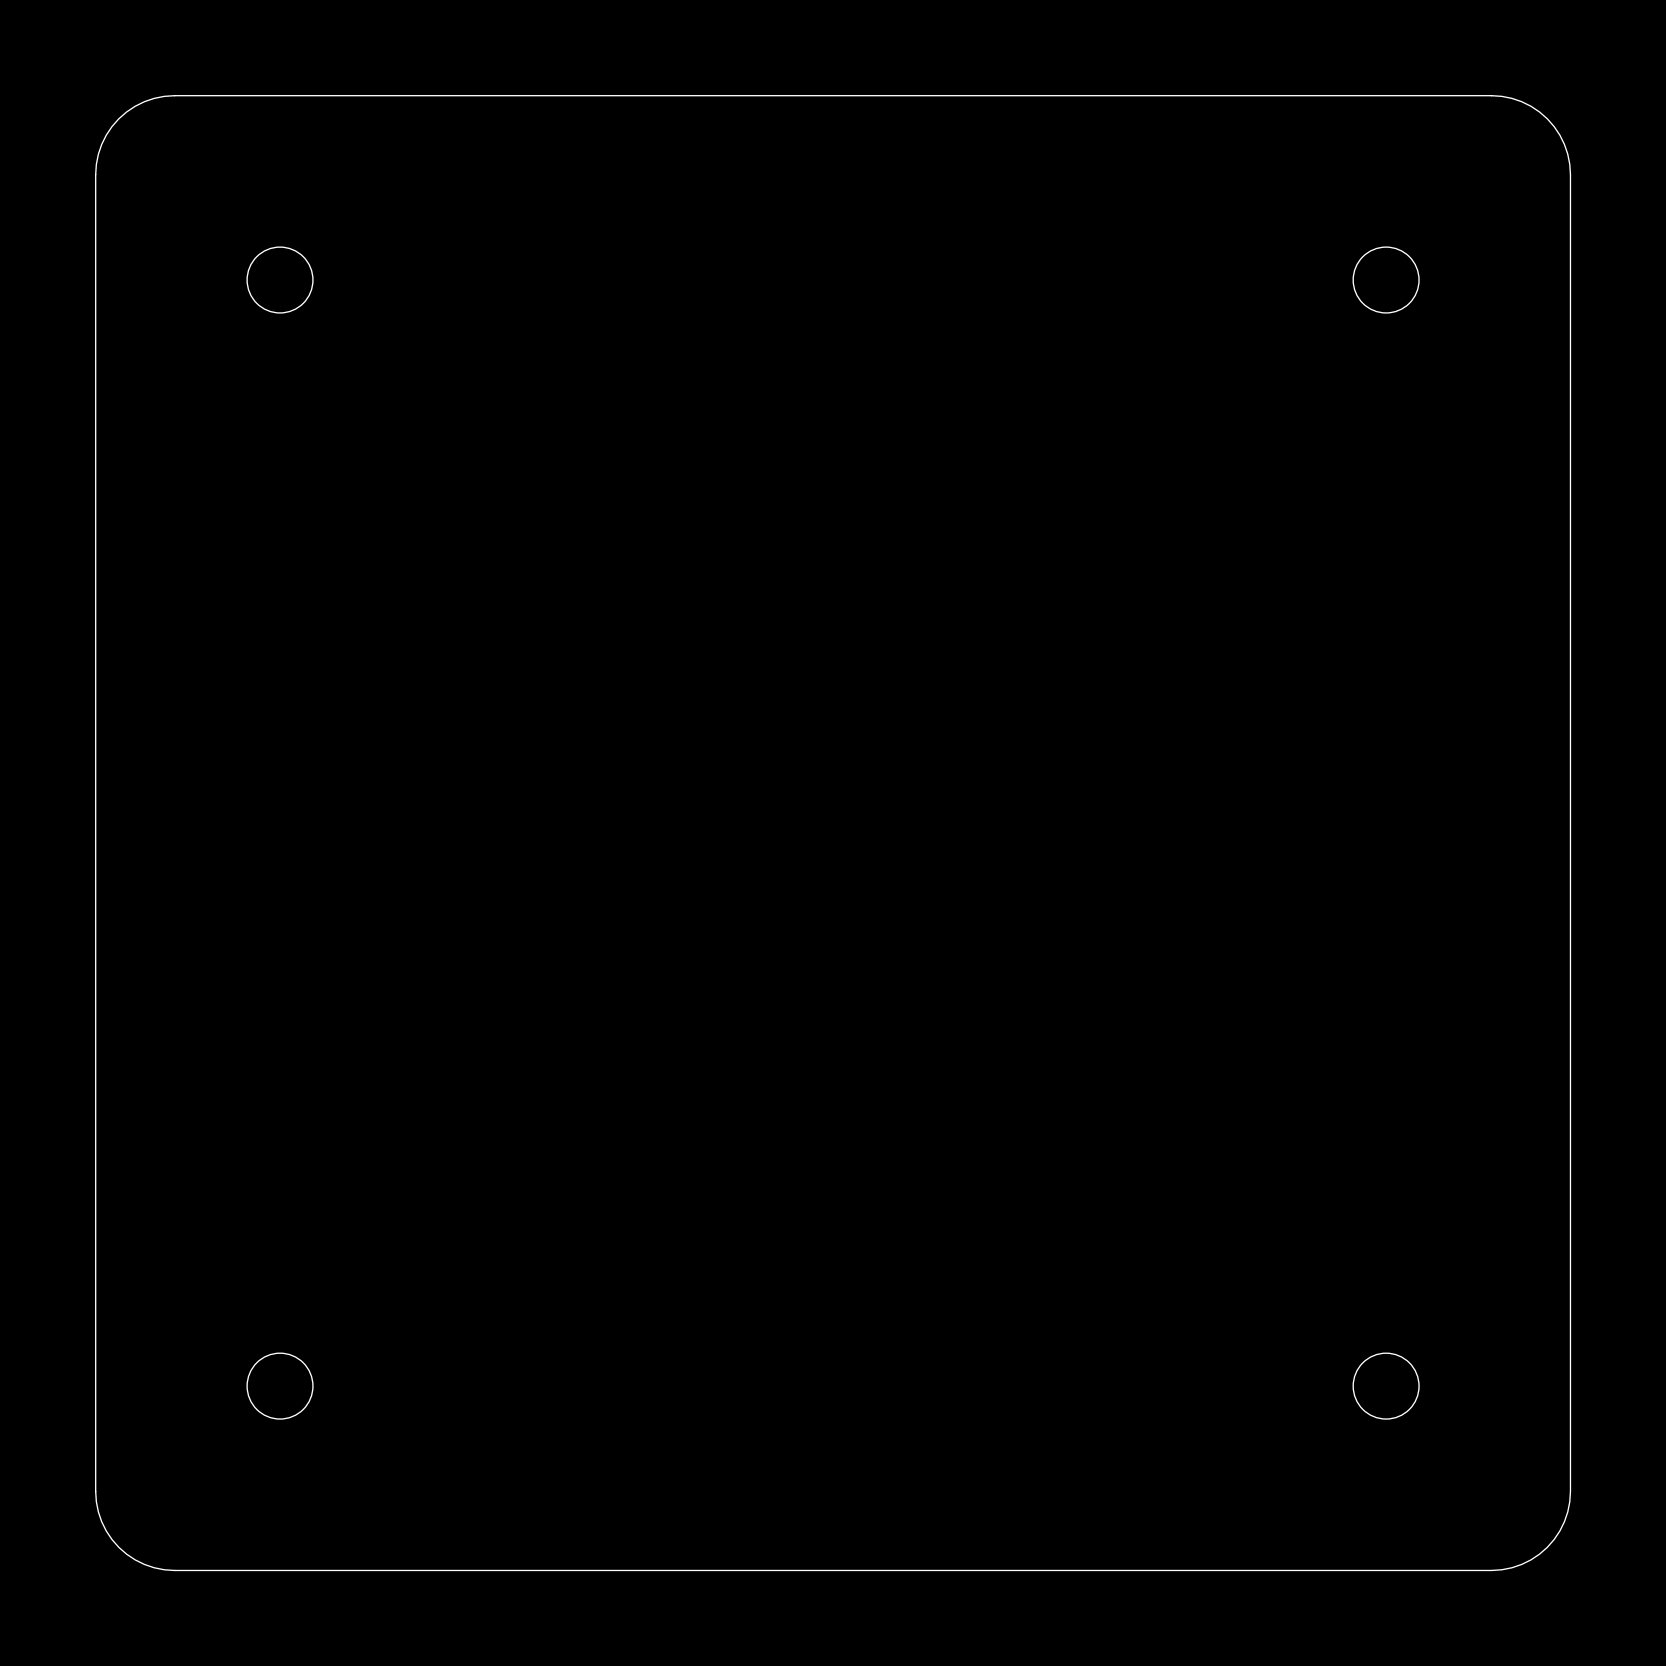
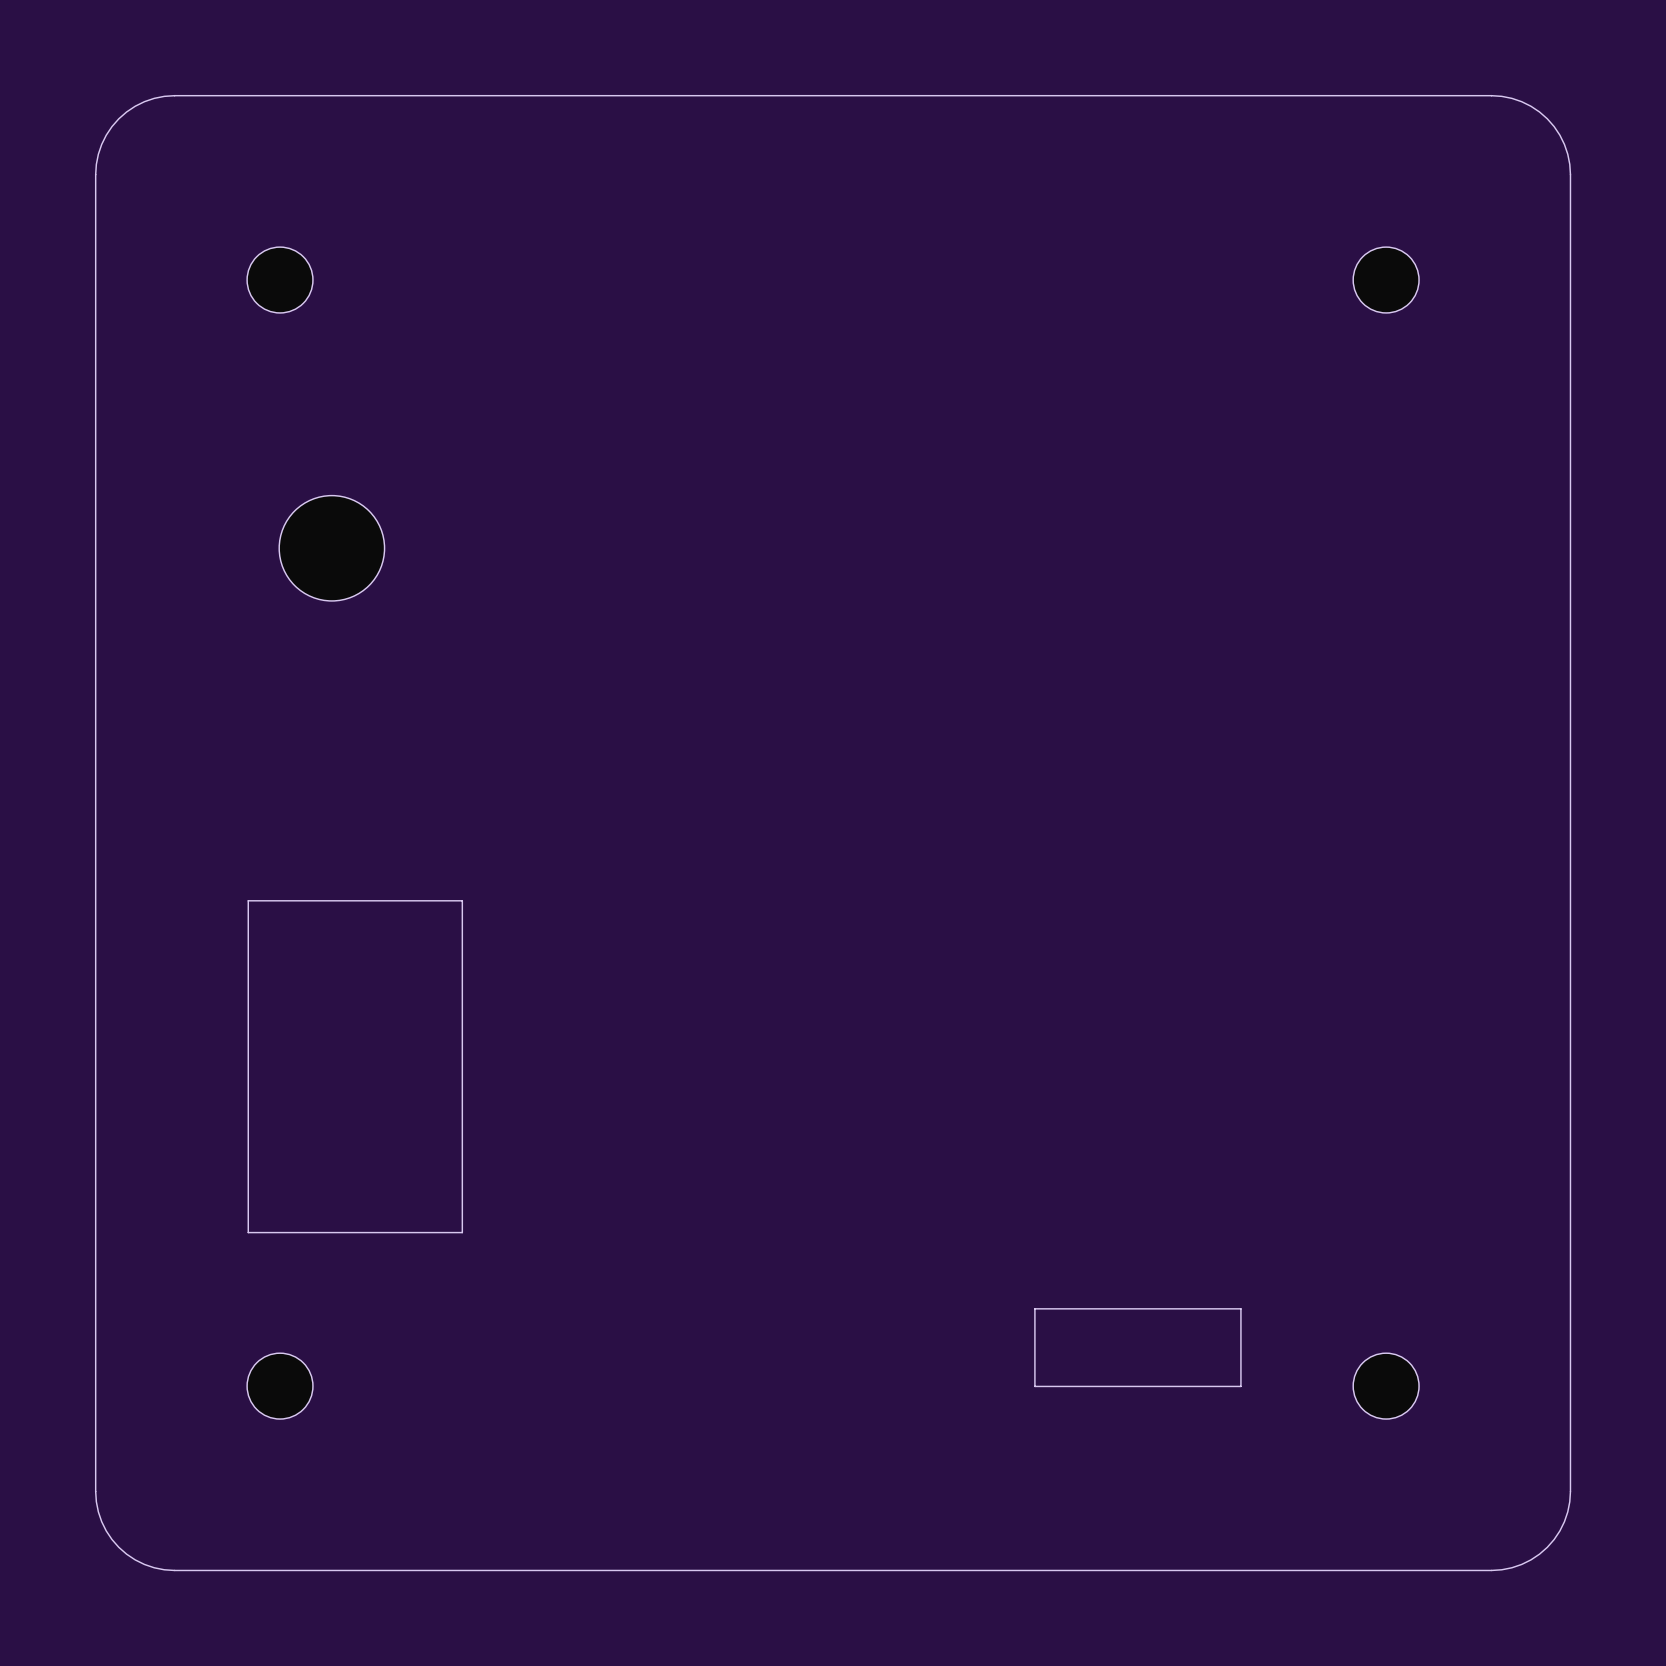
hole: none -> (331, 548)
board edge: none -> (248, 900) (462, 900) (462, 1232) (248, 1232) (248, 900)
board edge: none -> (1034, 1308) (1240, 1308) (1240, 1386) (1034, 1386) (1034, 1308)

